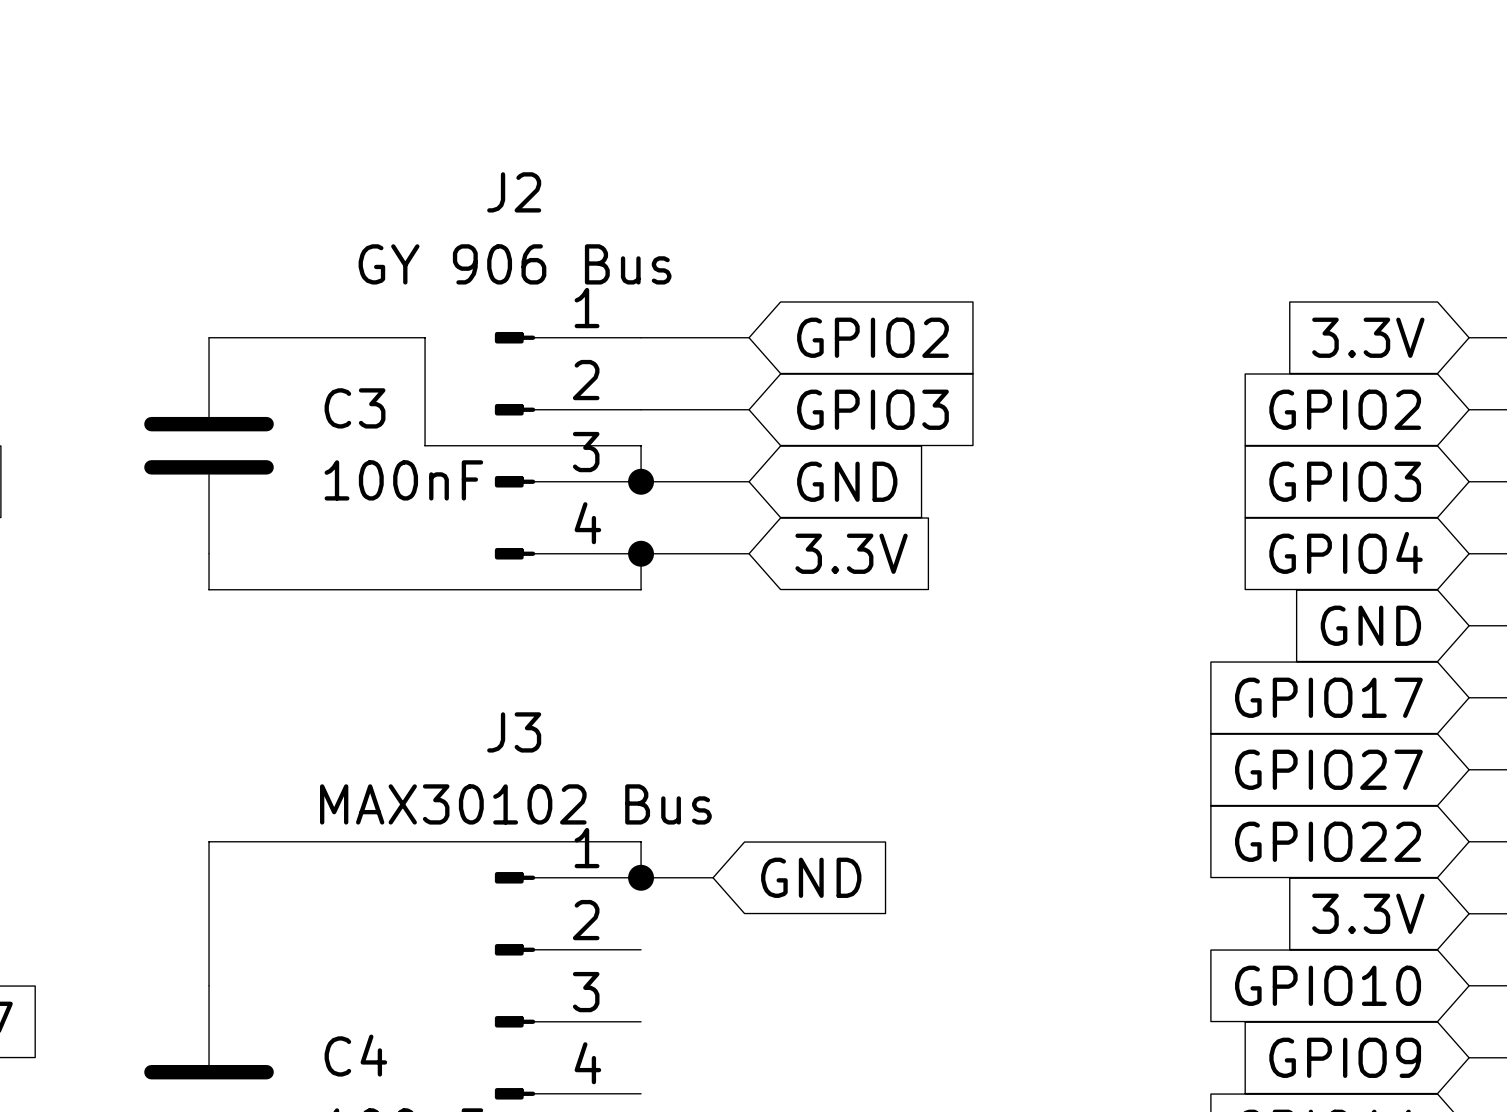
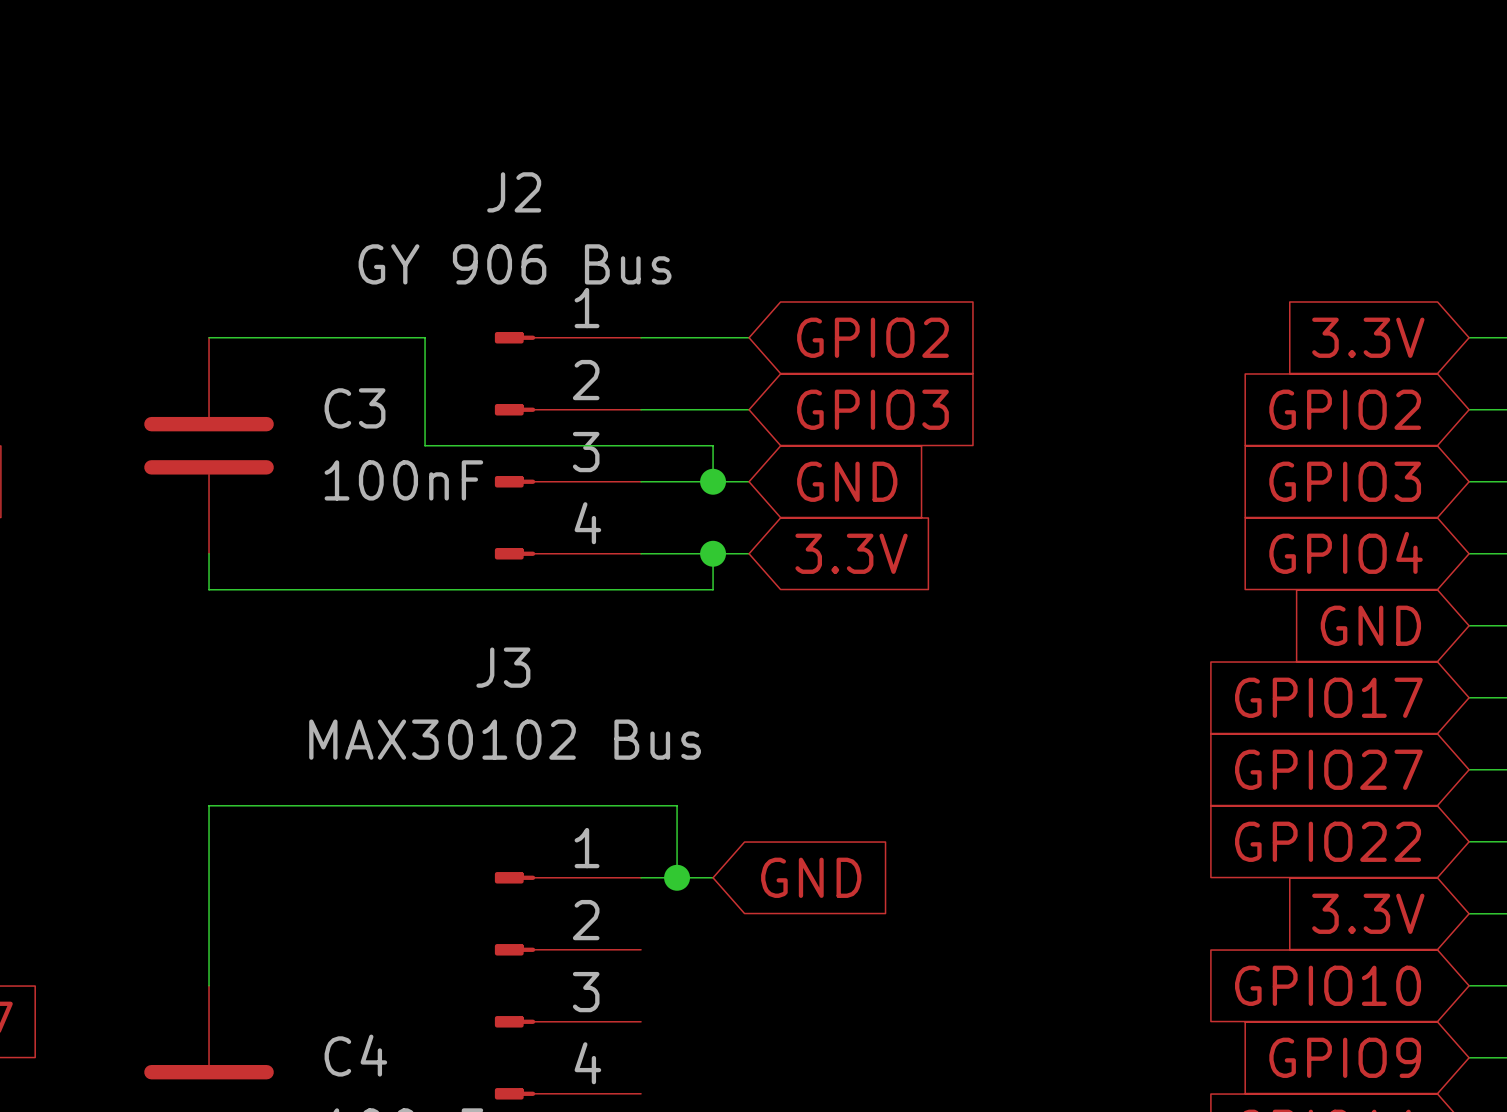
wire: (641, 445) (641, 481) -> (641, 445) (713, 445) (713, 481)
junction: (641, 481) -> none
junction: none -> (713, 481)
wire: (641, 553) (641, 589) -> (713, 553) (713, 589) (641, 589)
junction: (641, 553) -> none
junction: none -> (713, 553)
J3 name position: J3 (514, 732) -> J3 (503, 667)
J3 value position: MAX30102 Bus (515, 804) -> MAX30102 Bus (505, 739)
wire: (209, 841) (641, 841) (641, 877) -> (209, 841) (209, 805) (677, 805) (677, 877)
junction position: (641, 877) -> (677, 877)

